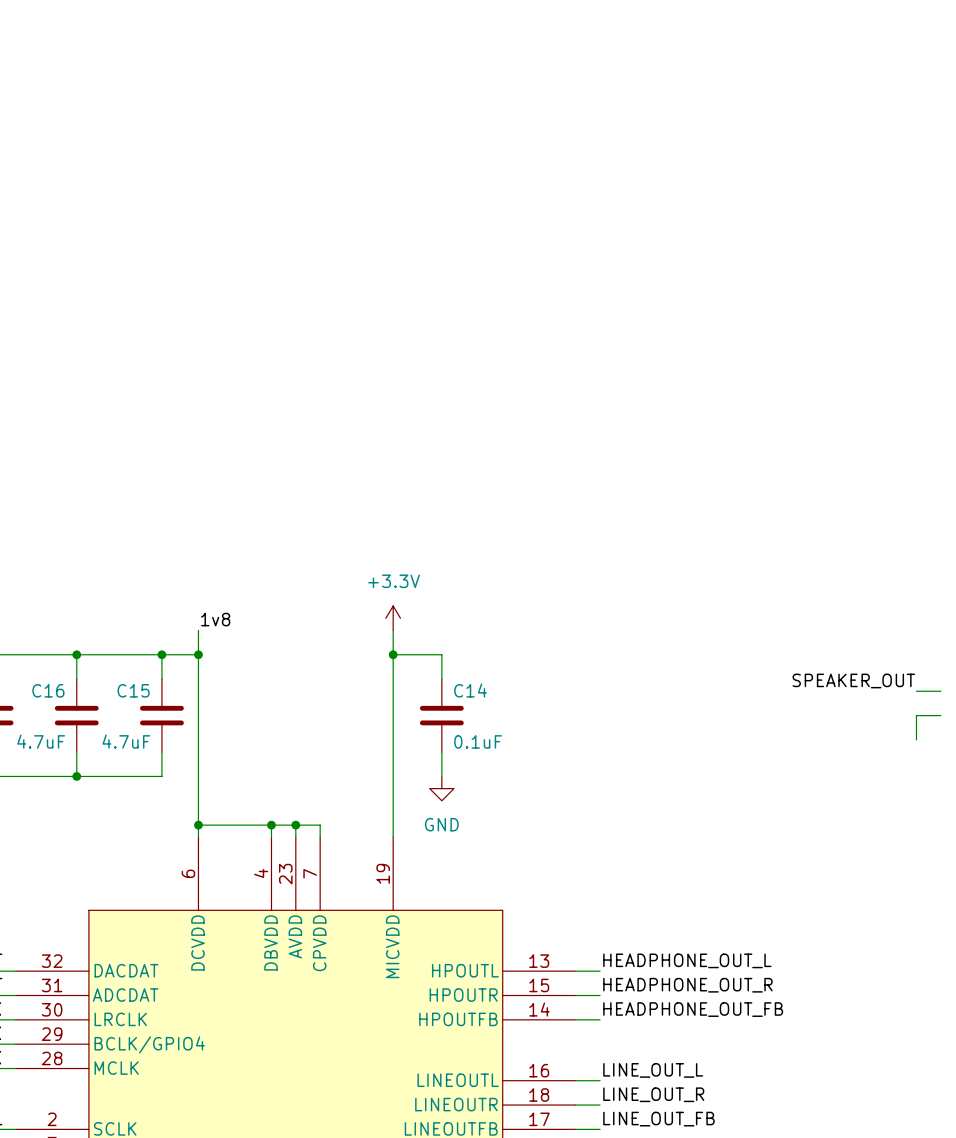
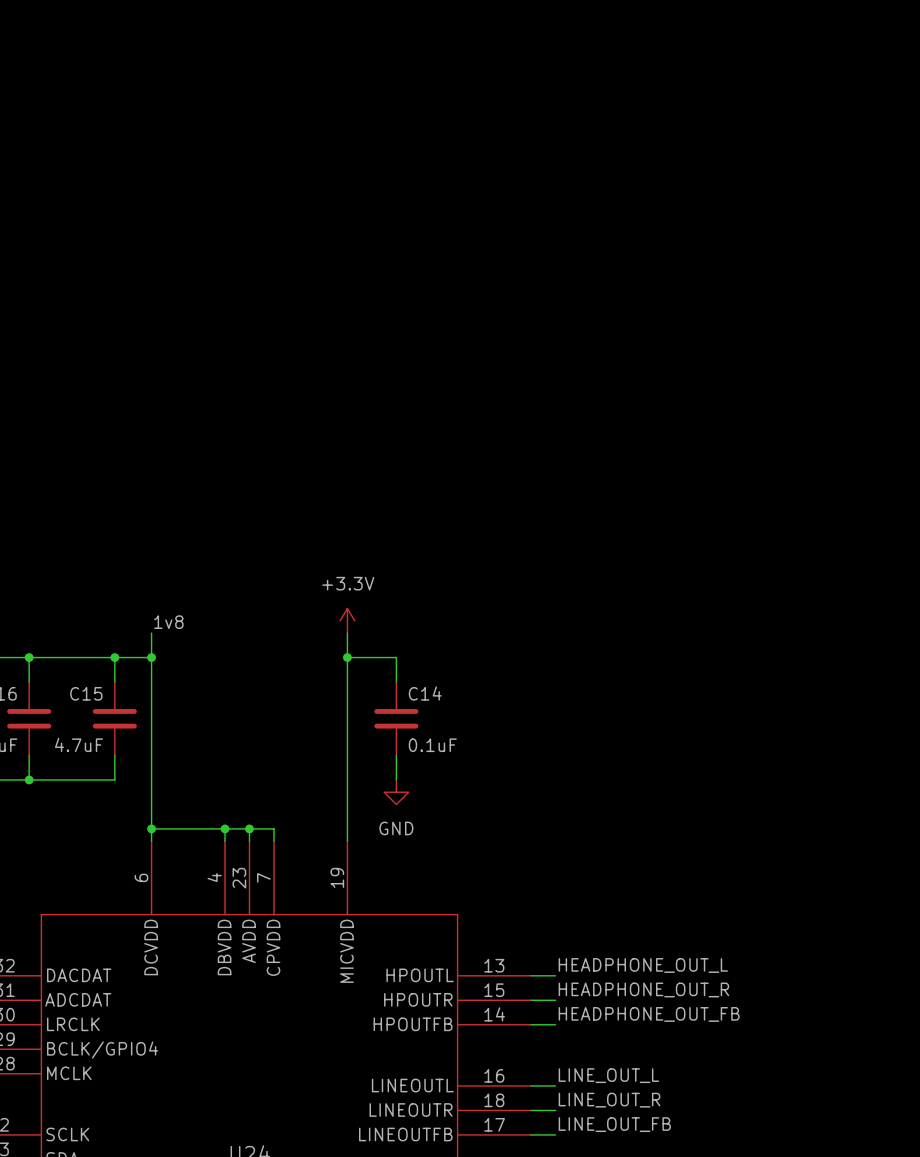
label: SPEAKER_OUT (853, 680) -> none
wire: (916, 691) (940, 691) -> none
wire: (940, 715) (916, 715) (916, 739) -> none

